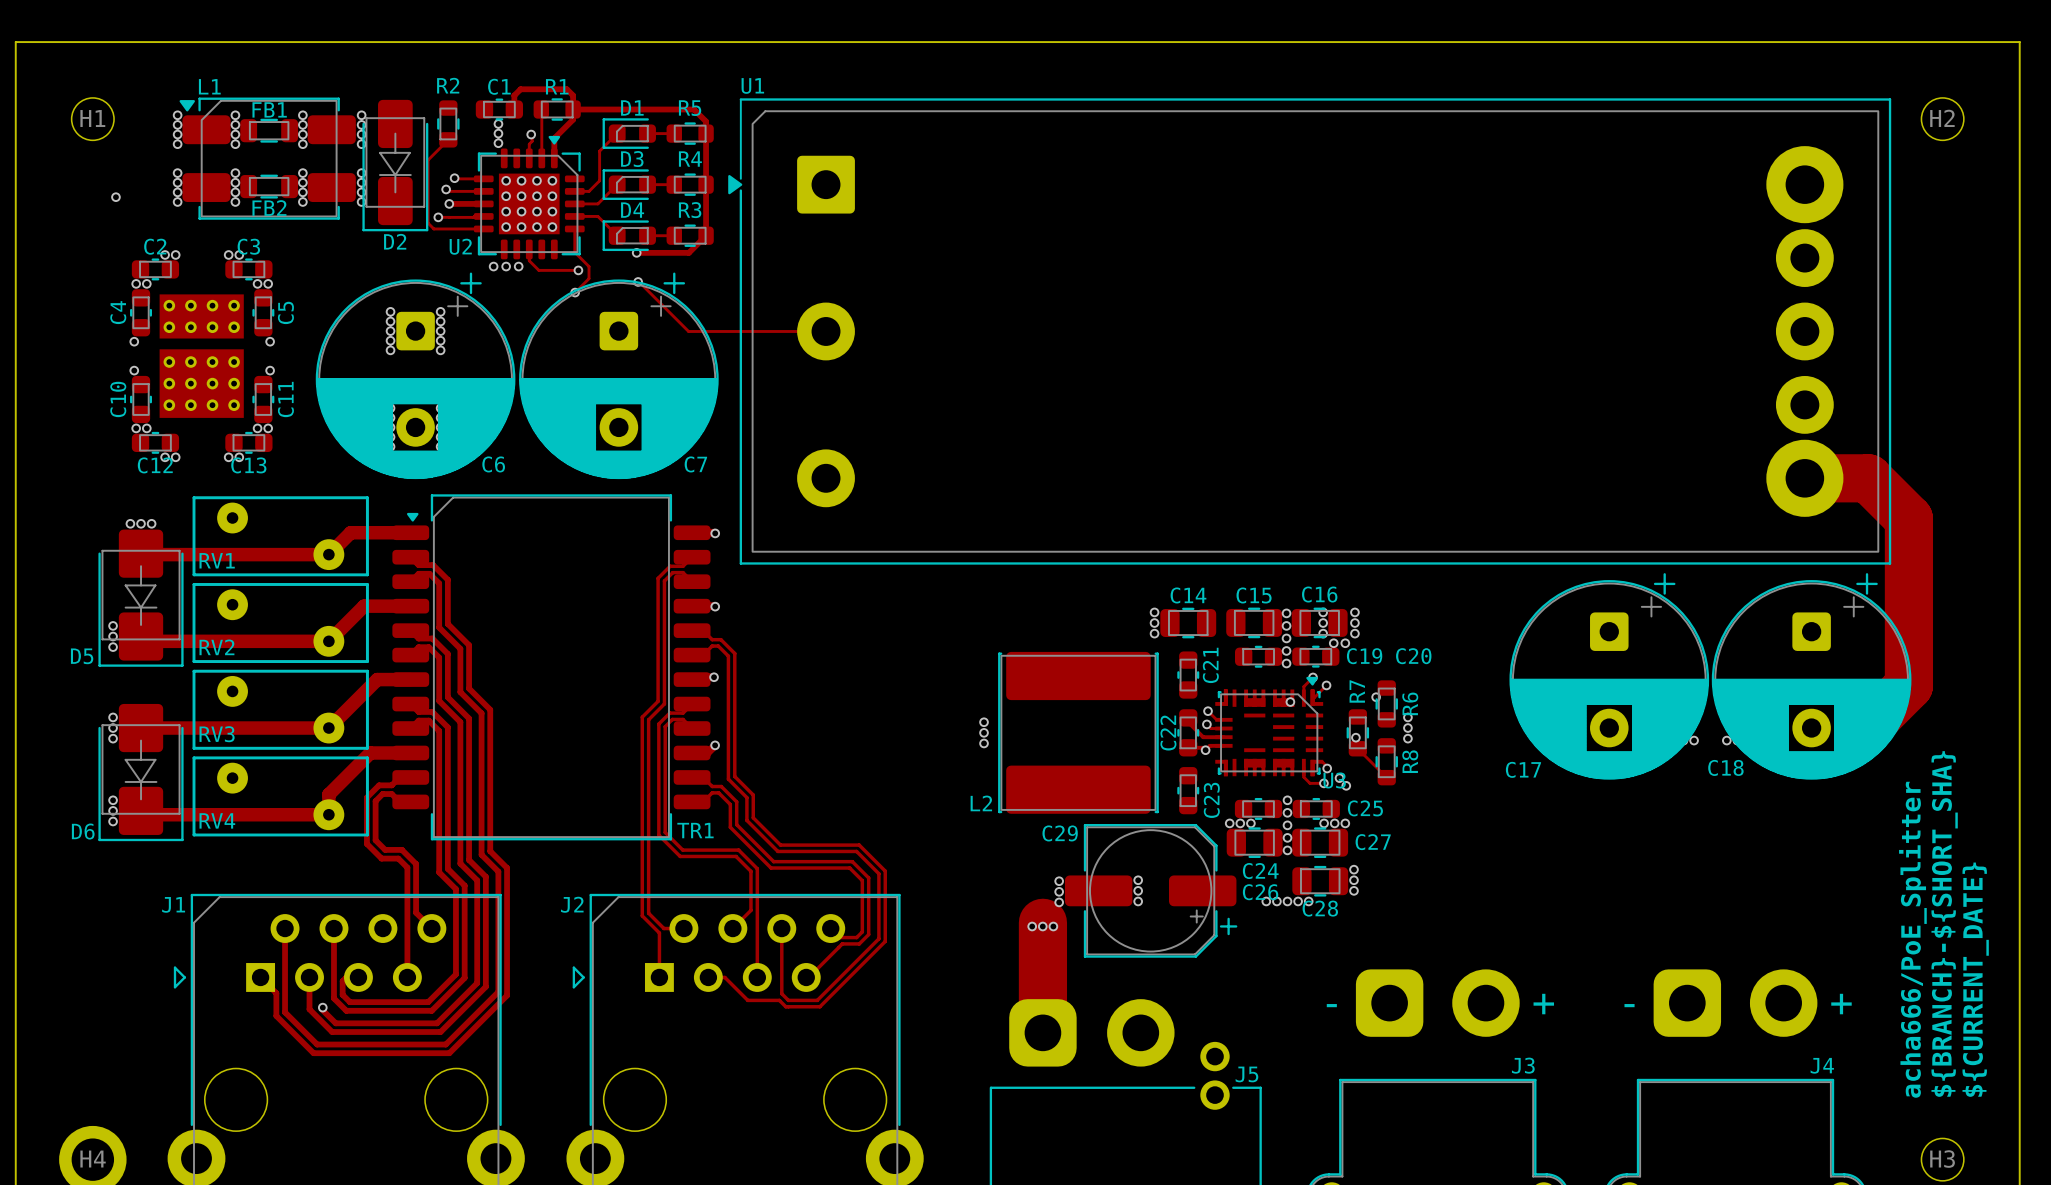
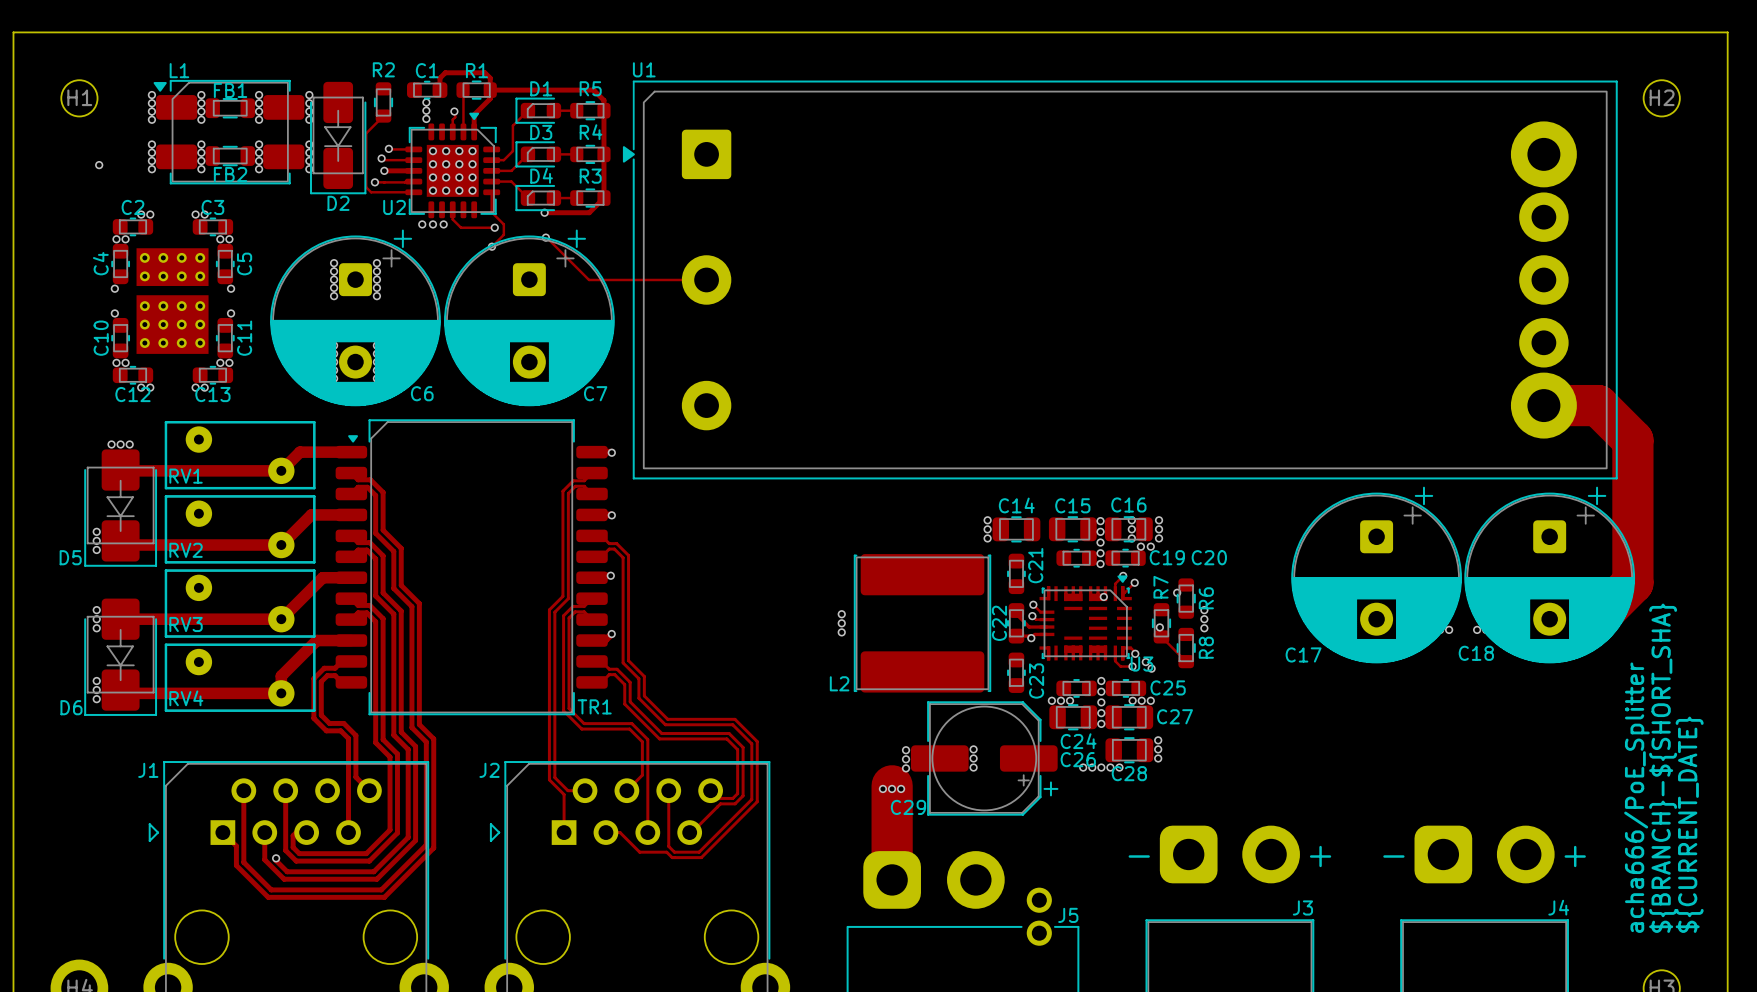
C29 name position: C29 (1060, 833) -> C29 (908, 807)

